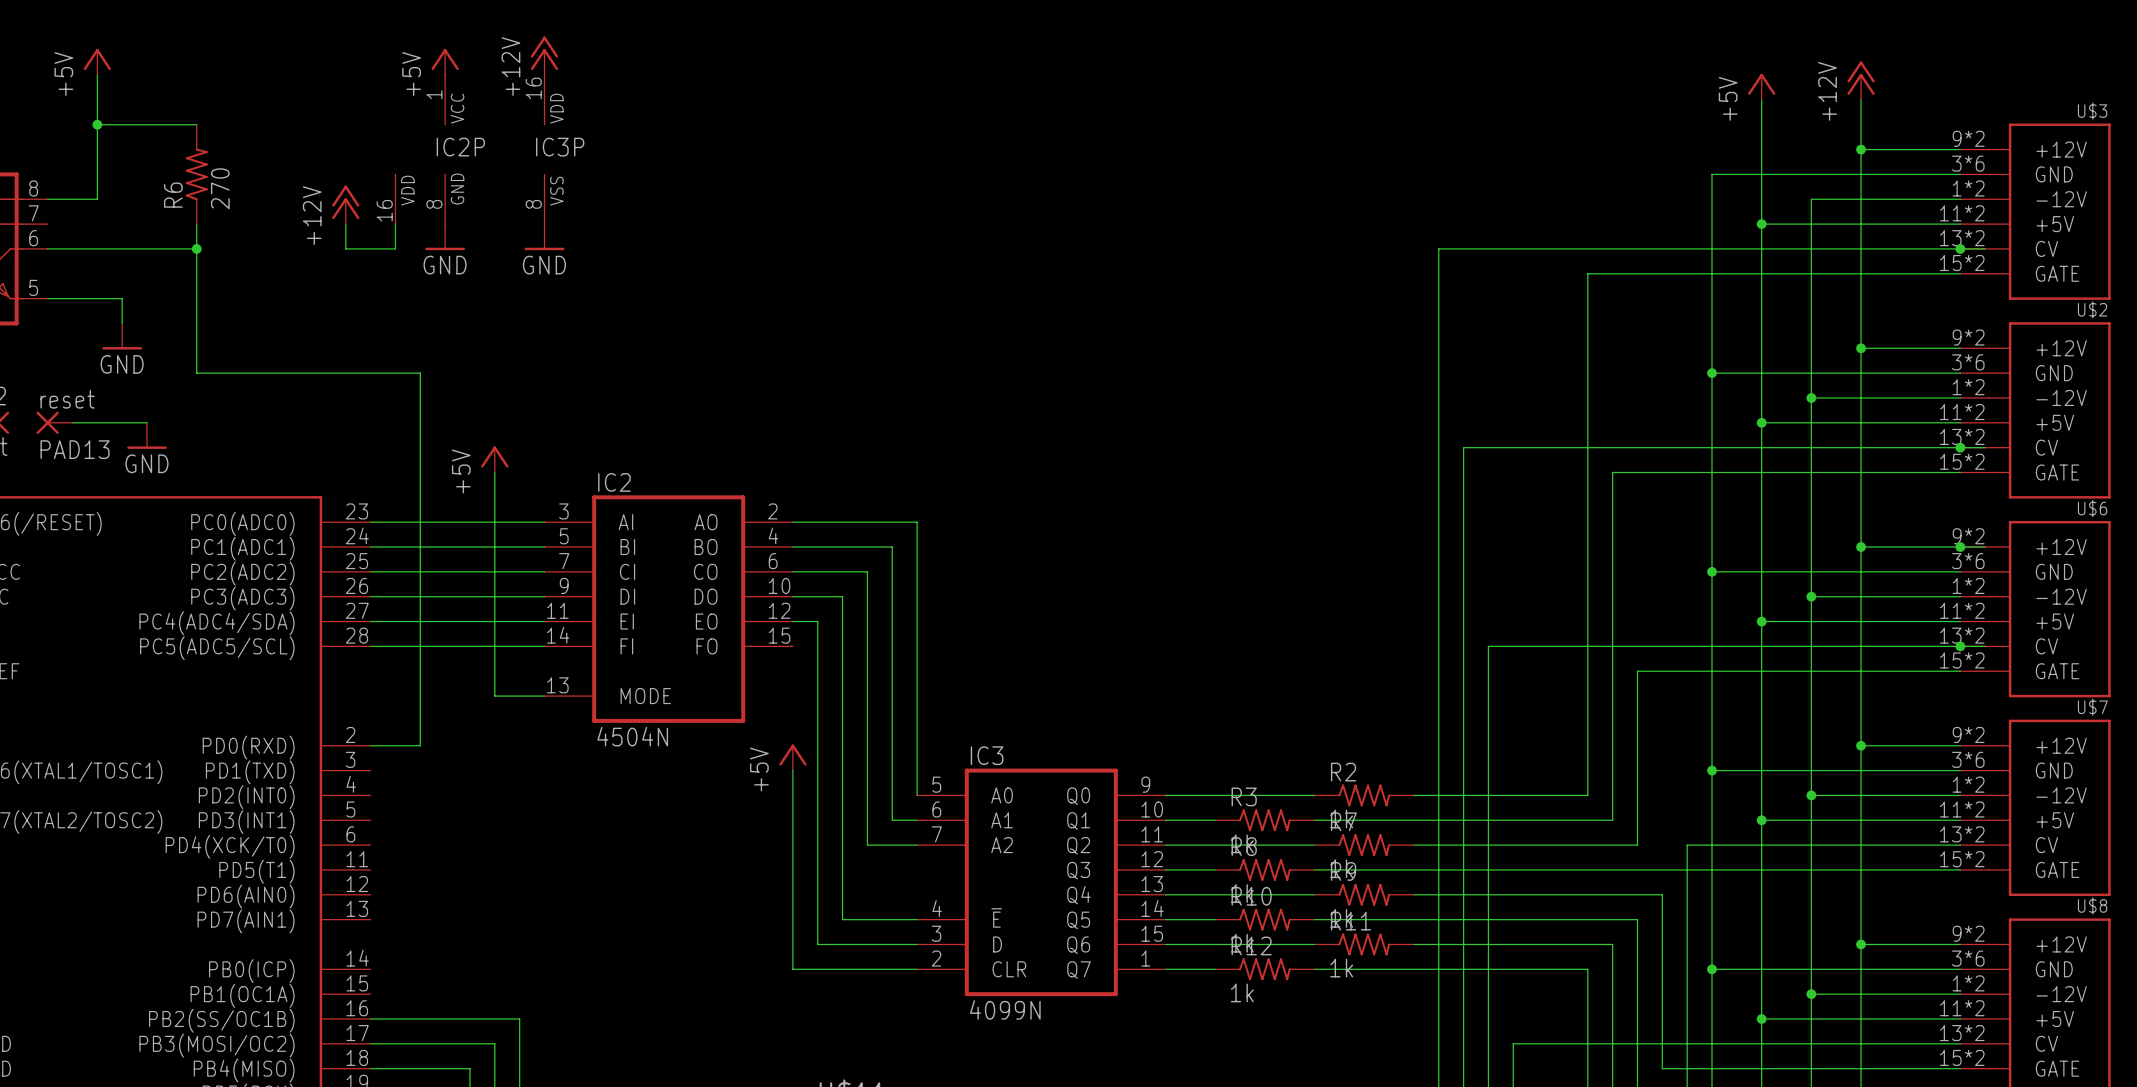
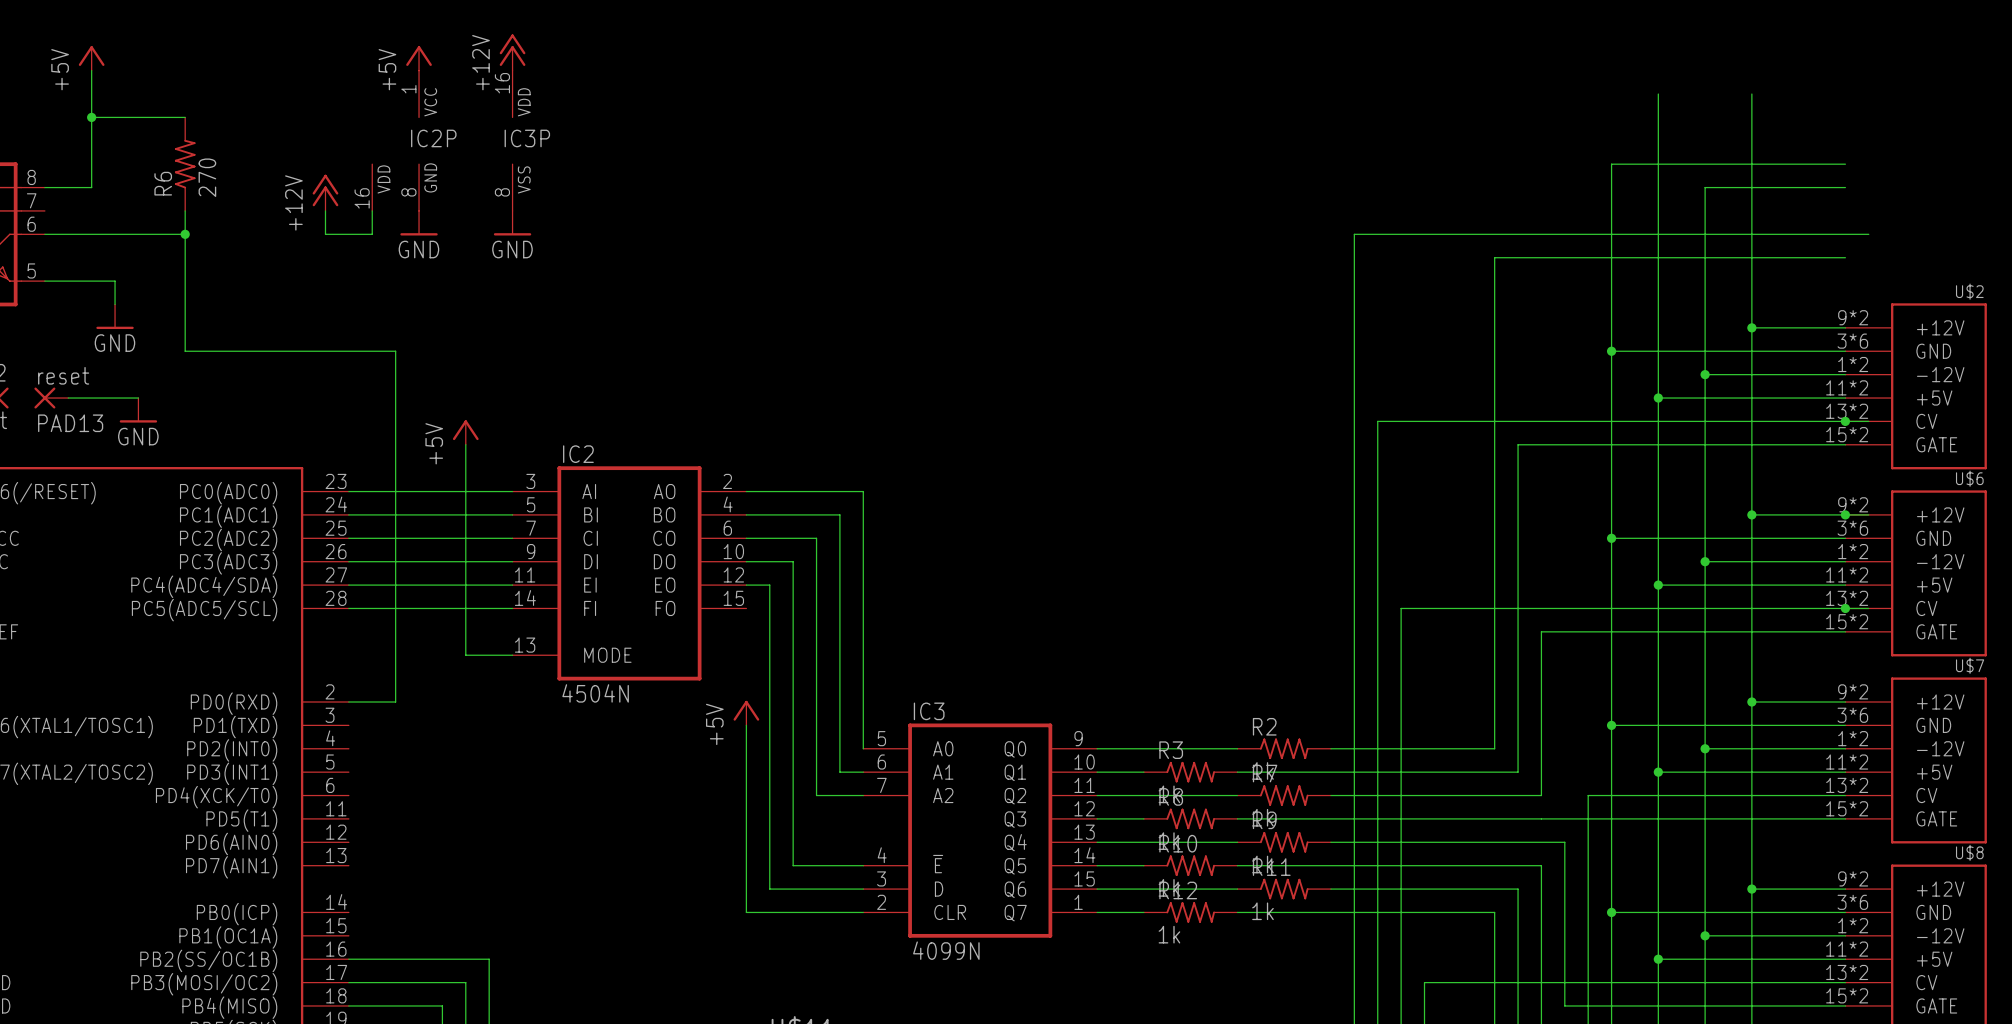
power symbol: +12V (1861, 80) -> none
power symbol: +5V (1761, 86) -> none
wire: (1861, 149) (1960, 149) -> none
junction: (1861, 149) -> none
U$3: (2035, 211) -> none
wire: (1761, 224) (1960, 224) -> none
junction: (1761, 224) -> none
junction: (1960, 248) -> none

